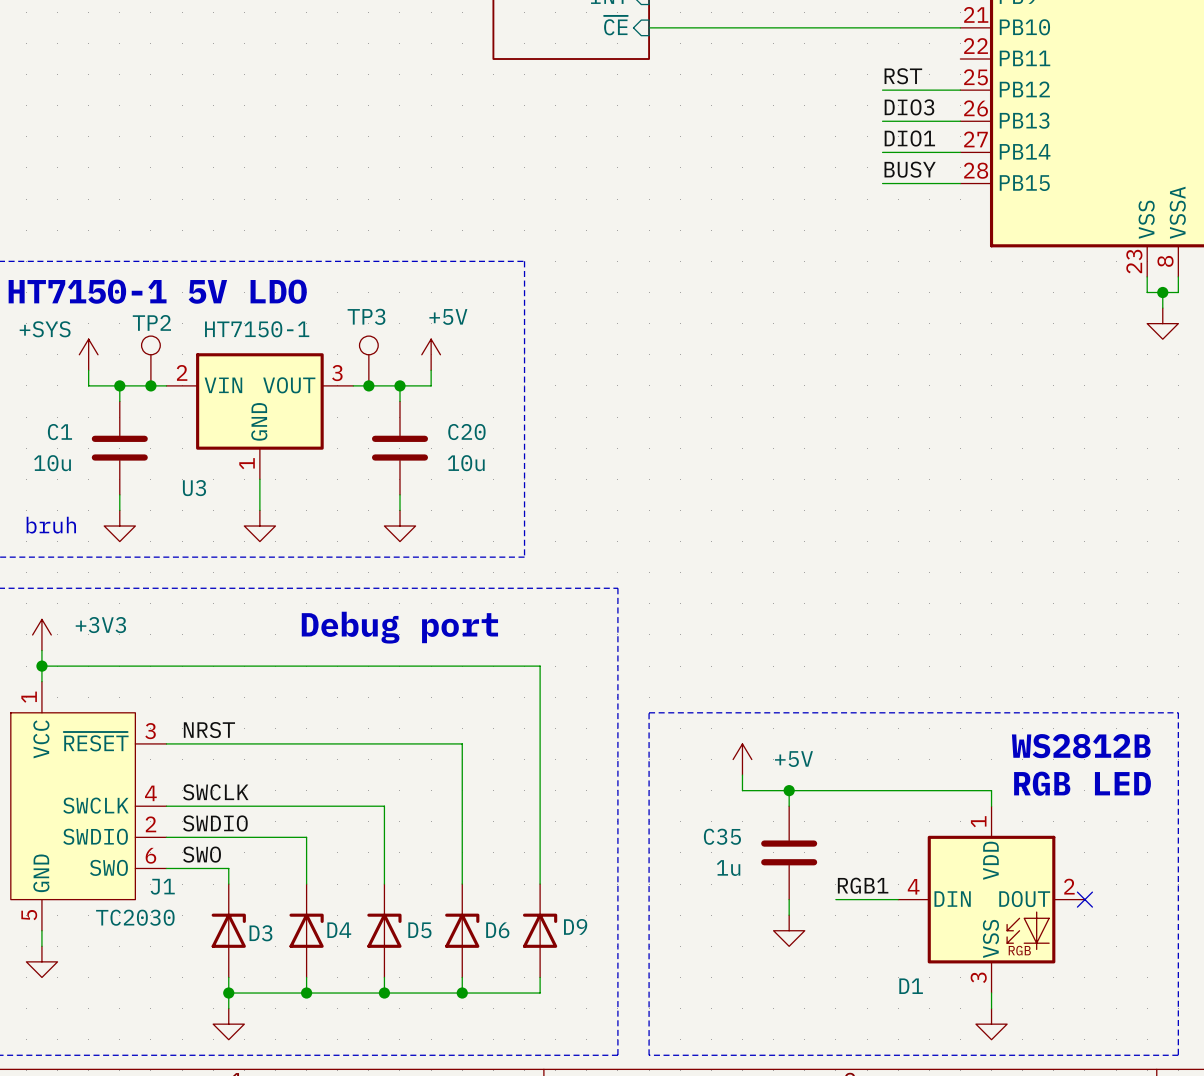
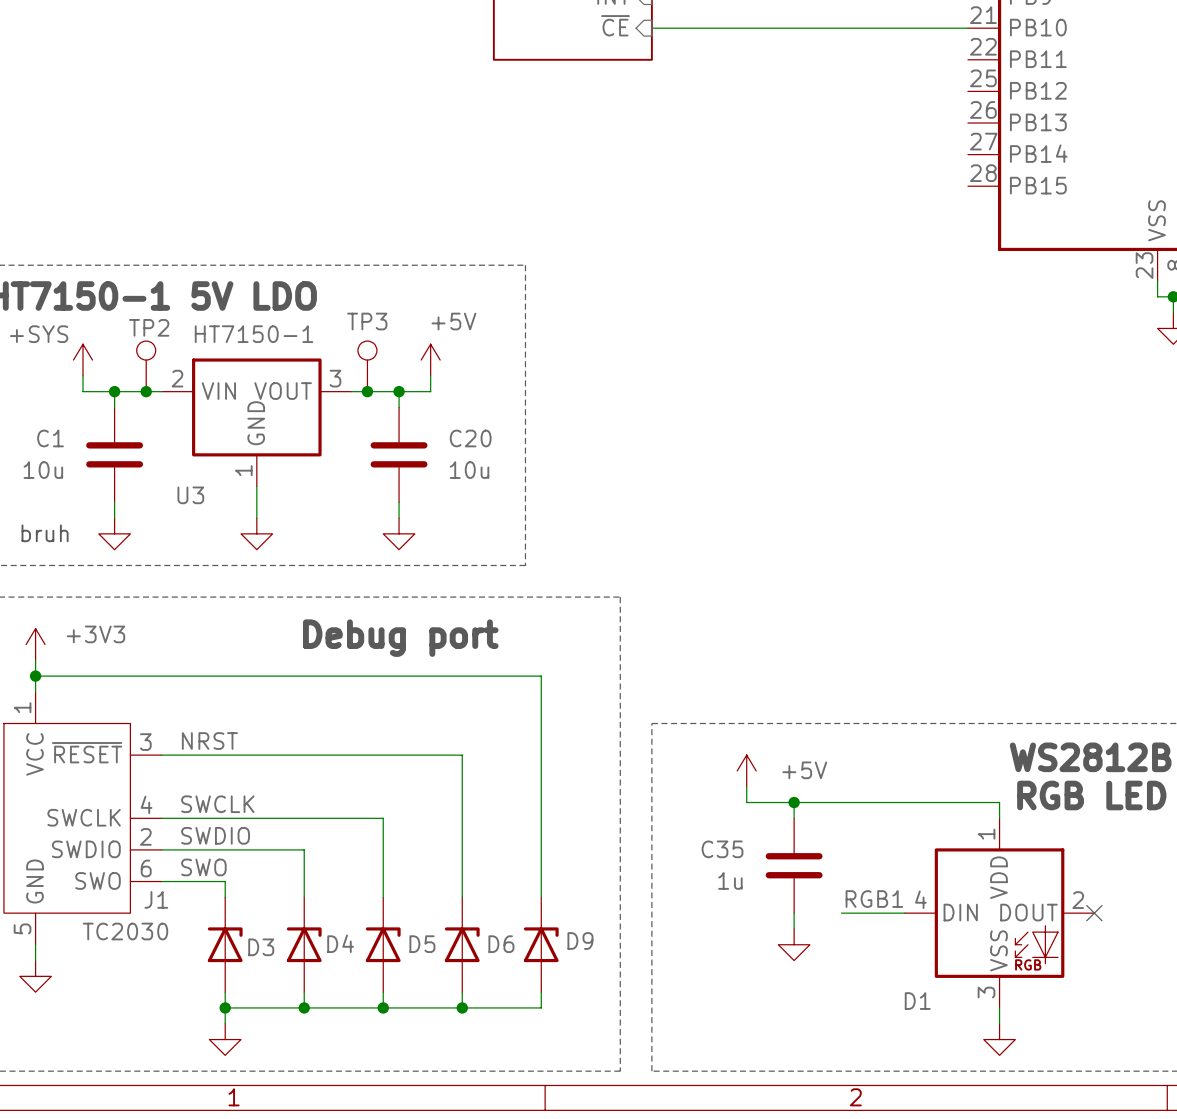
label: RST (903, 76) -> none
wire: (882, 90) (960, 90) -> none
label: DIO3 (909, 107) -> none
wire: (882, 121) (960, 121) -> none
label: DIO1 (909, 138) -> none
wire: (882, 152) (960, 152) -> none
label: BUSY (910, 169) -> none
wire: (882, 183) (960, 183) -> none

